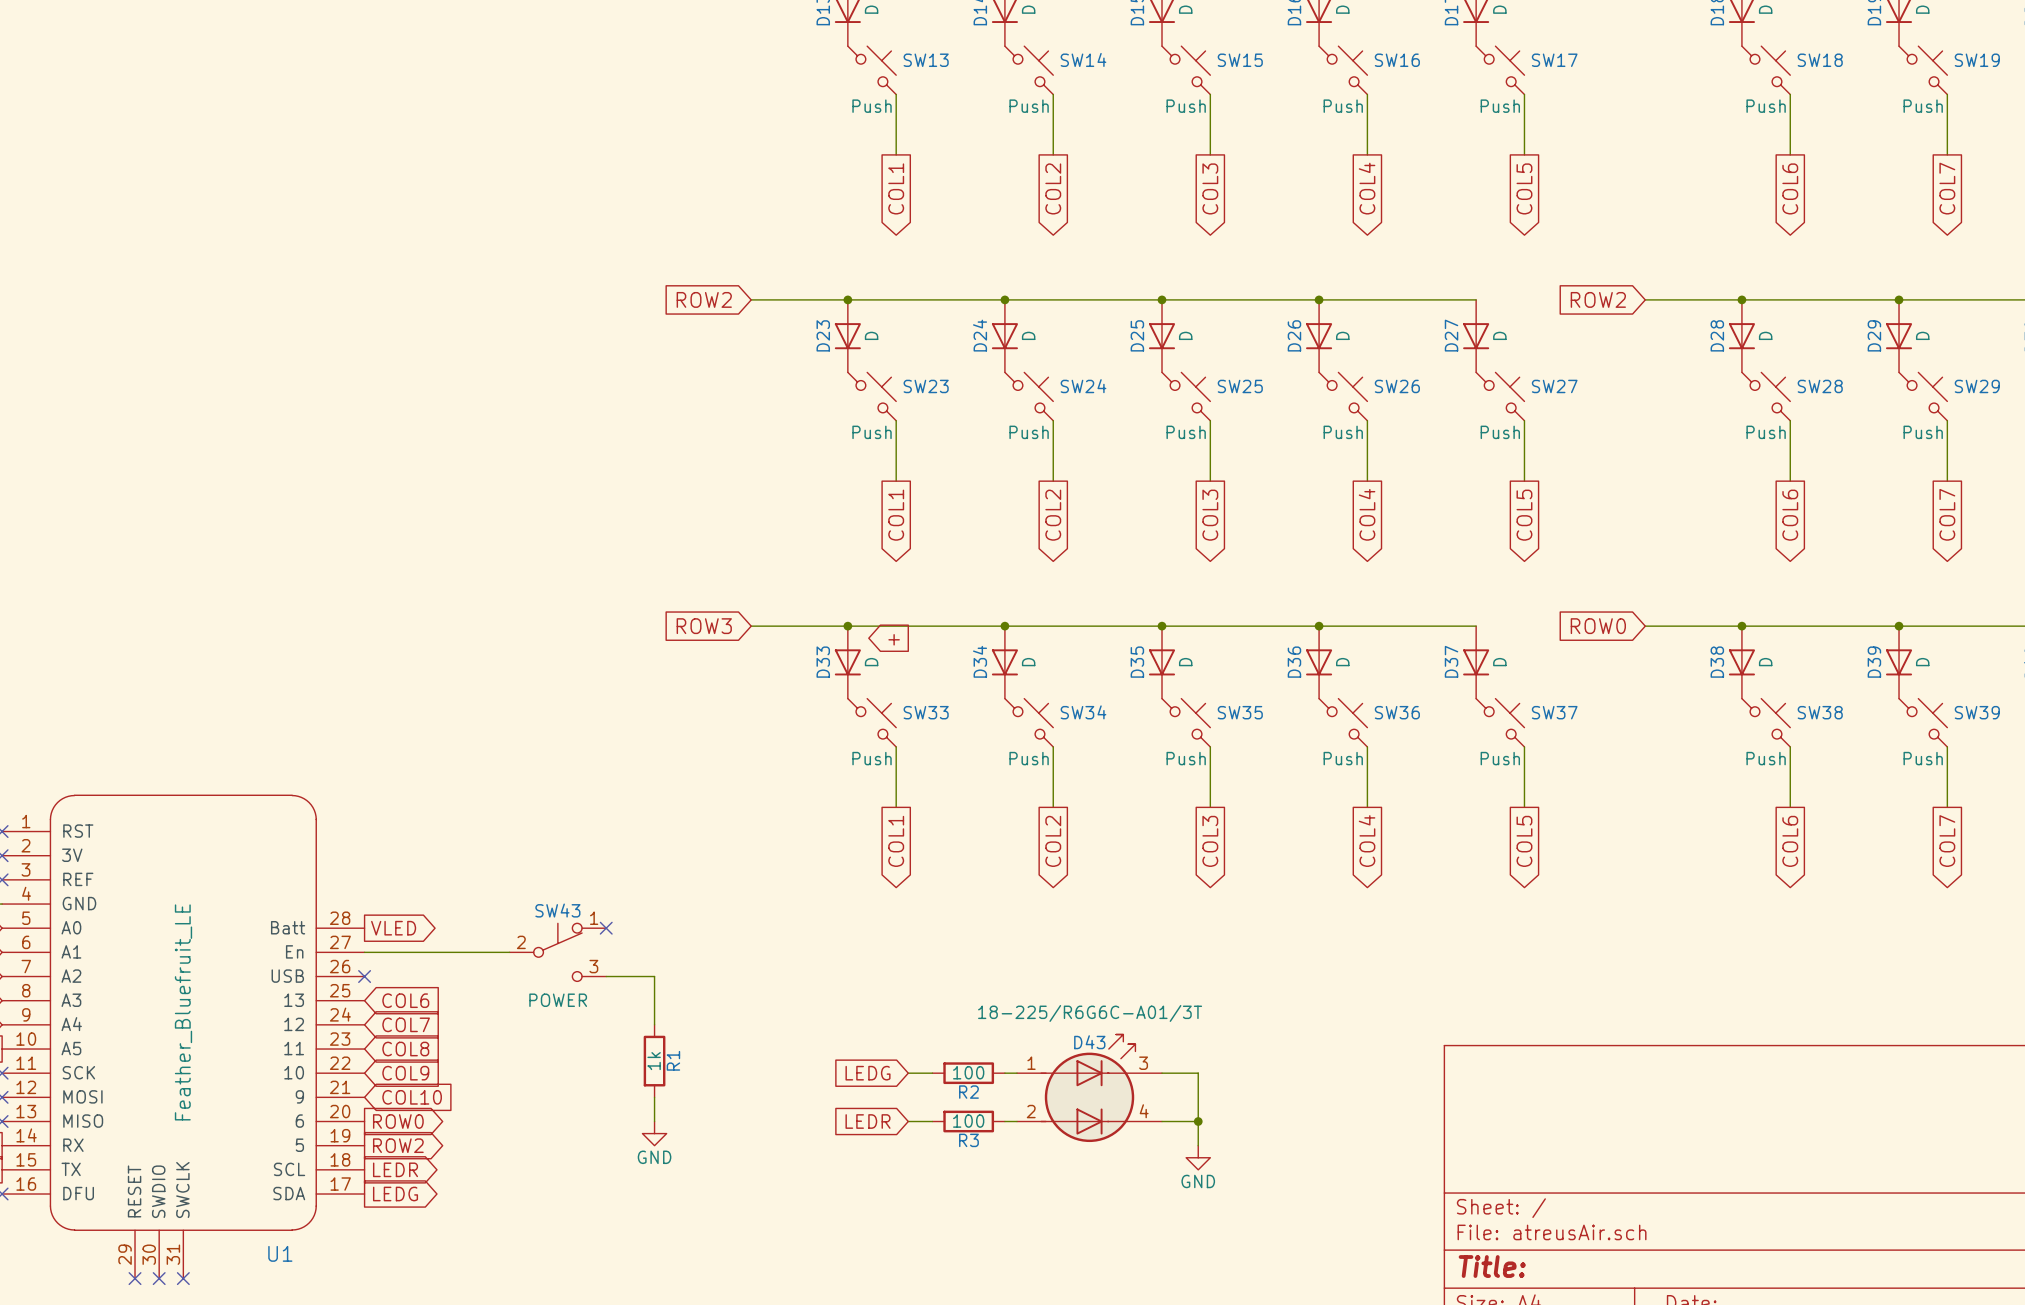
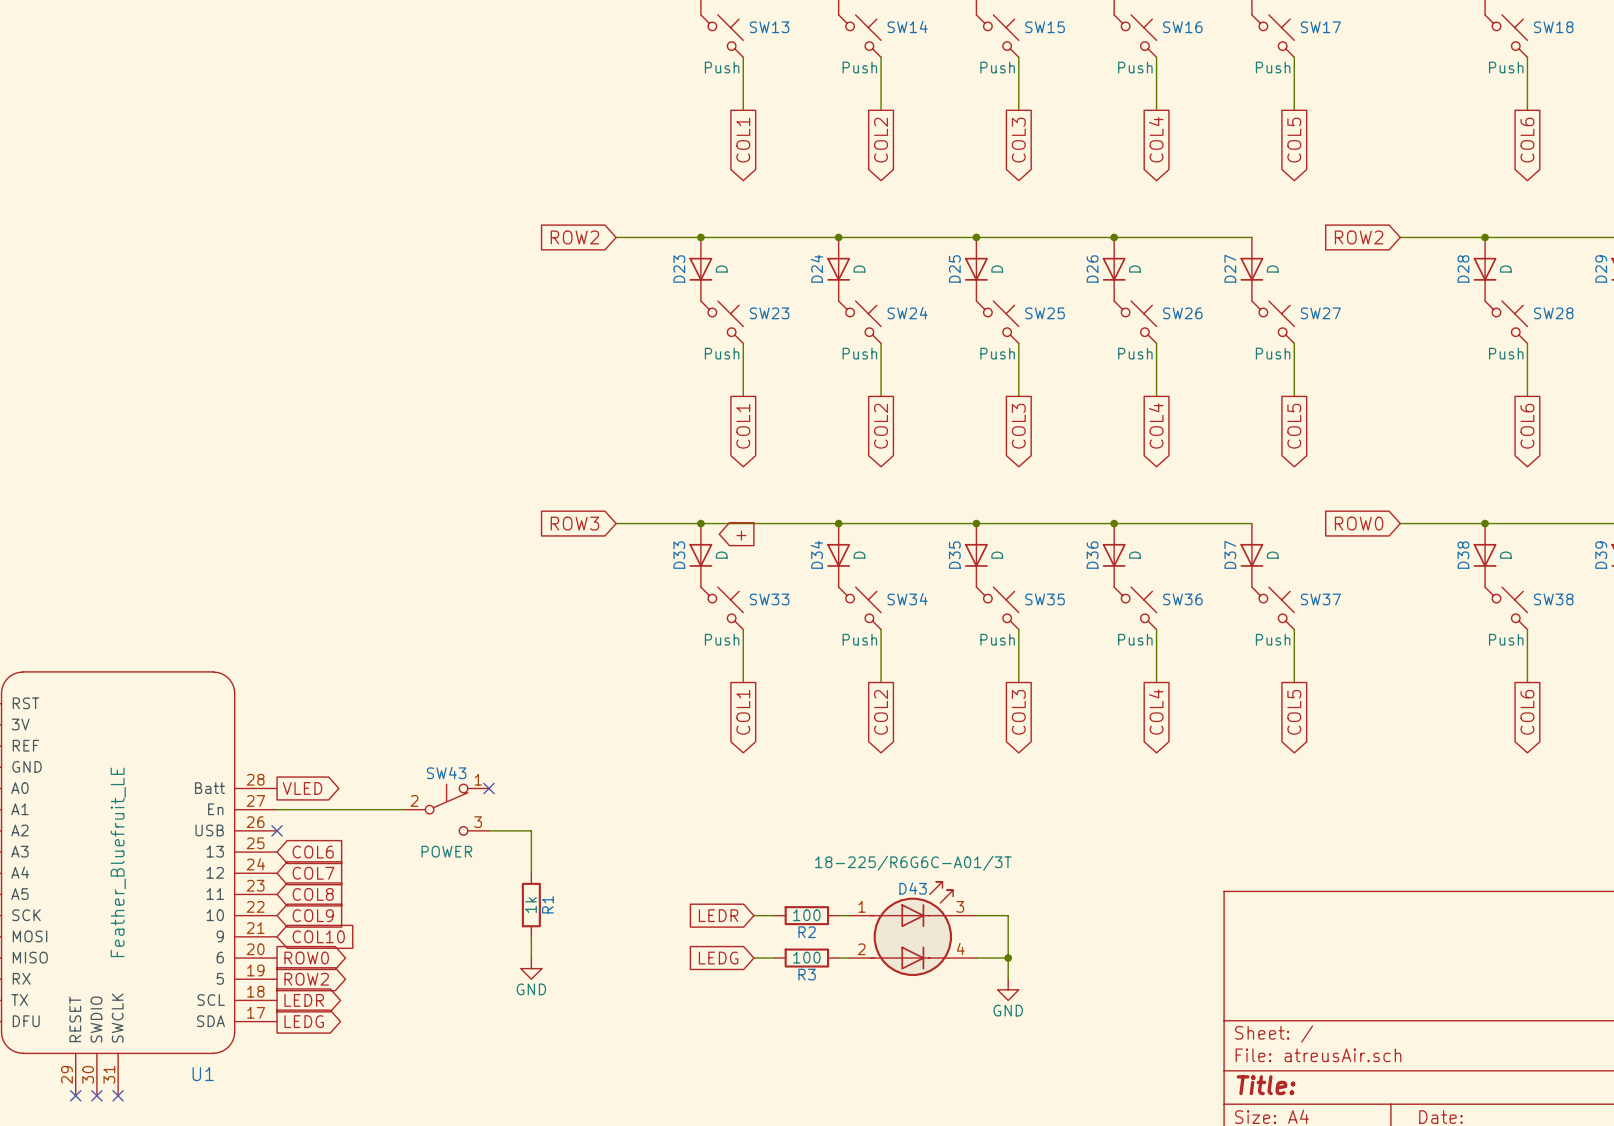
global label: LEDG (868, 1073) -> LEDR (718, 915)
global label: LEDR (868, 1121) -> LEDG (718, 958)

